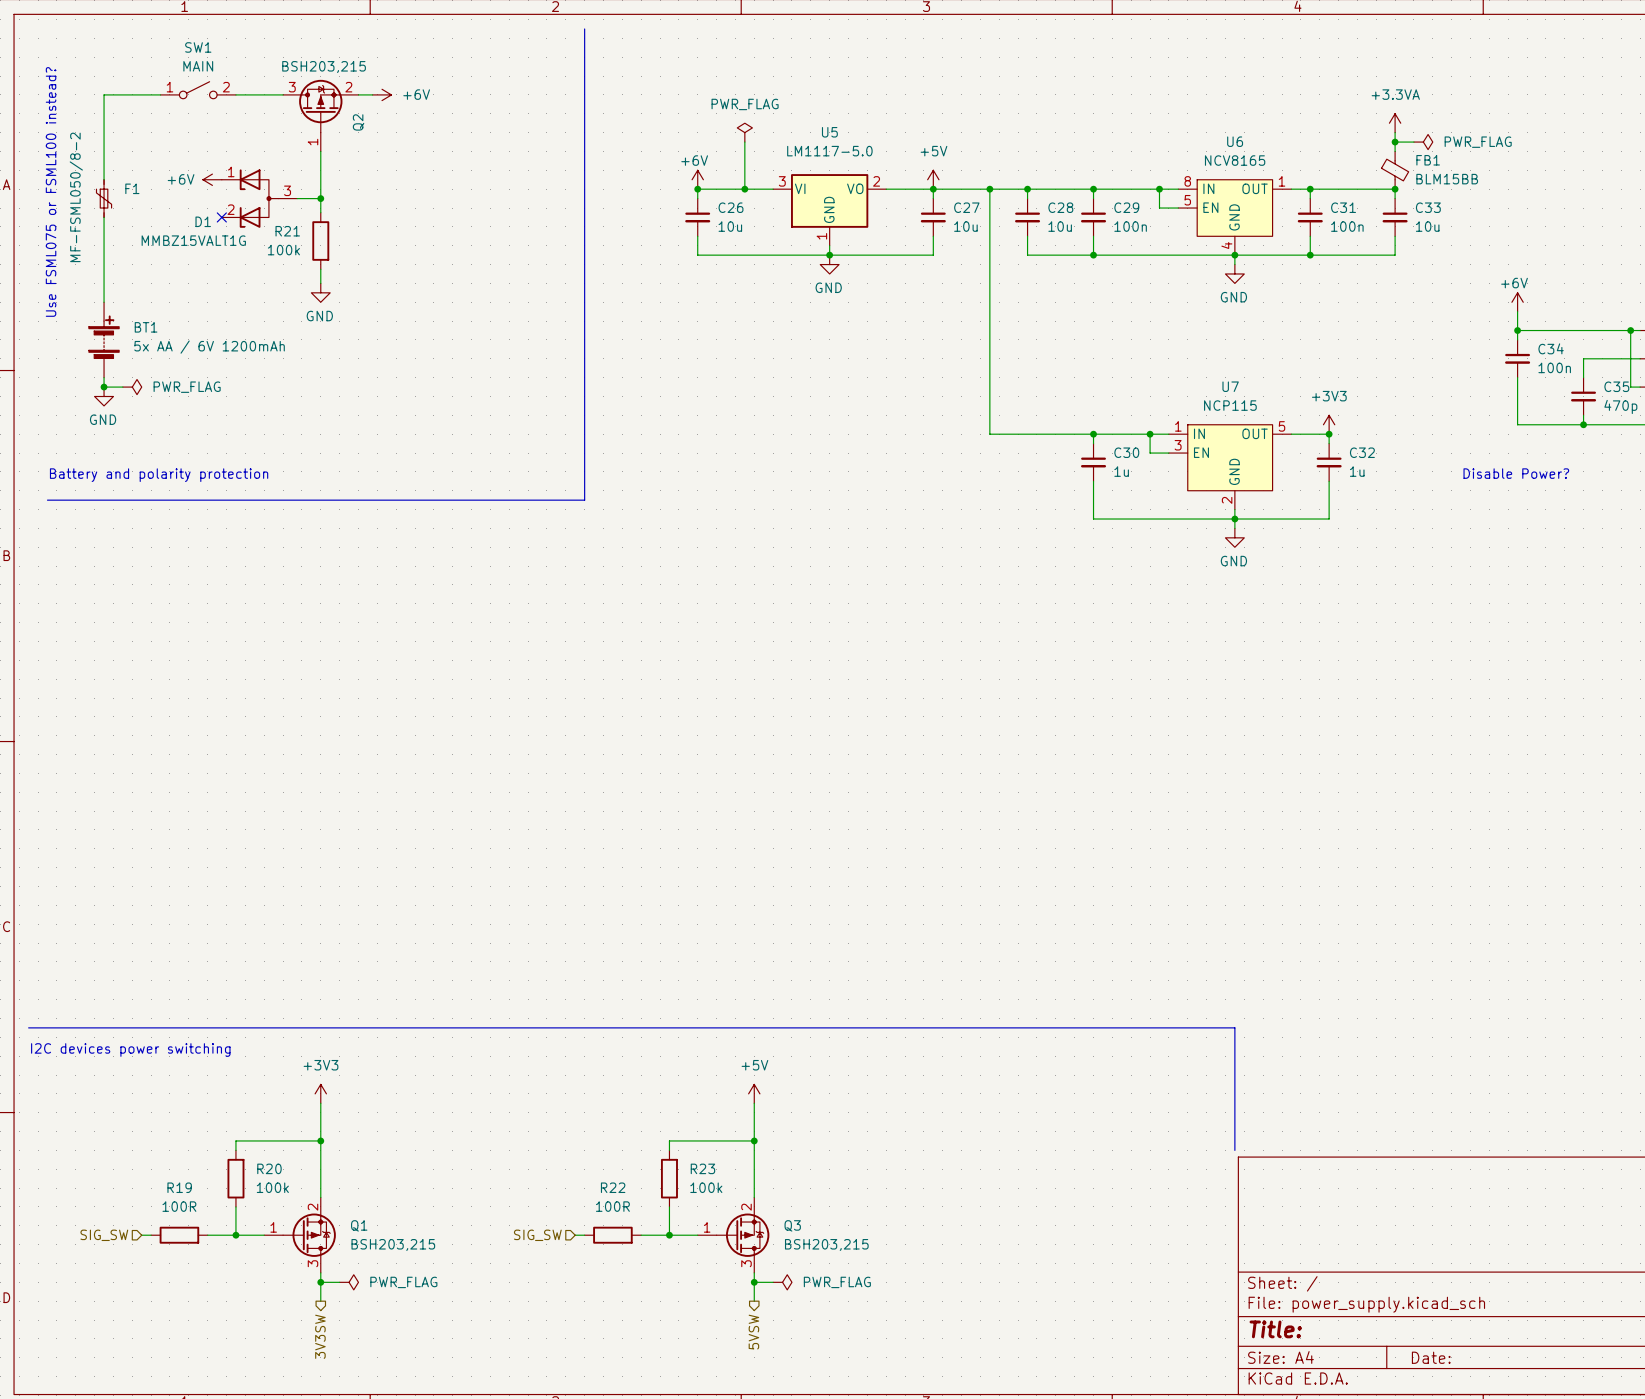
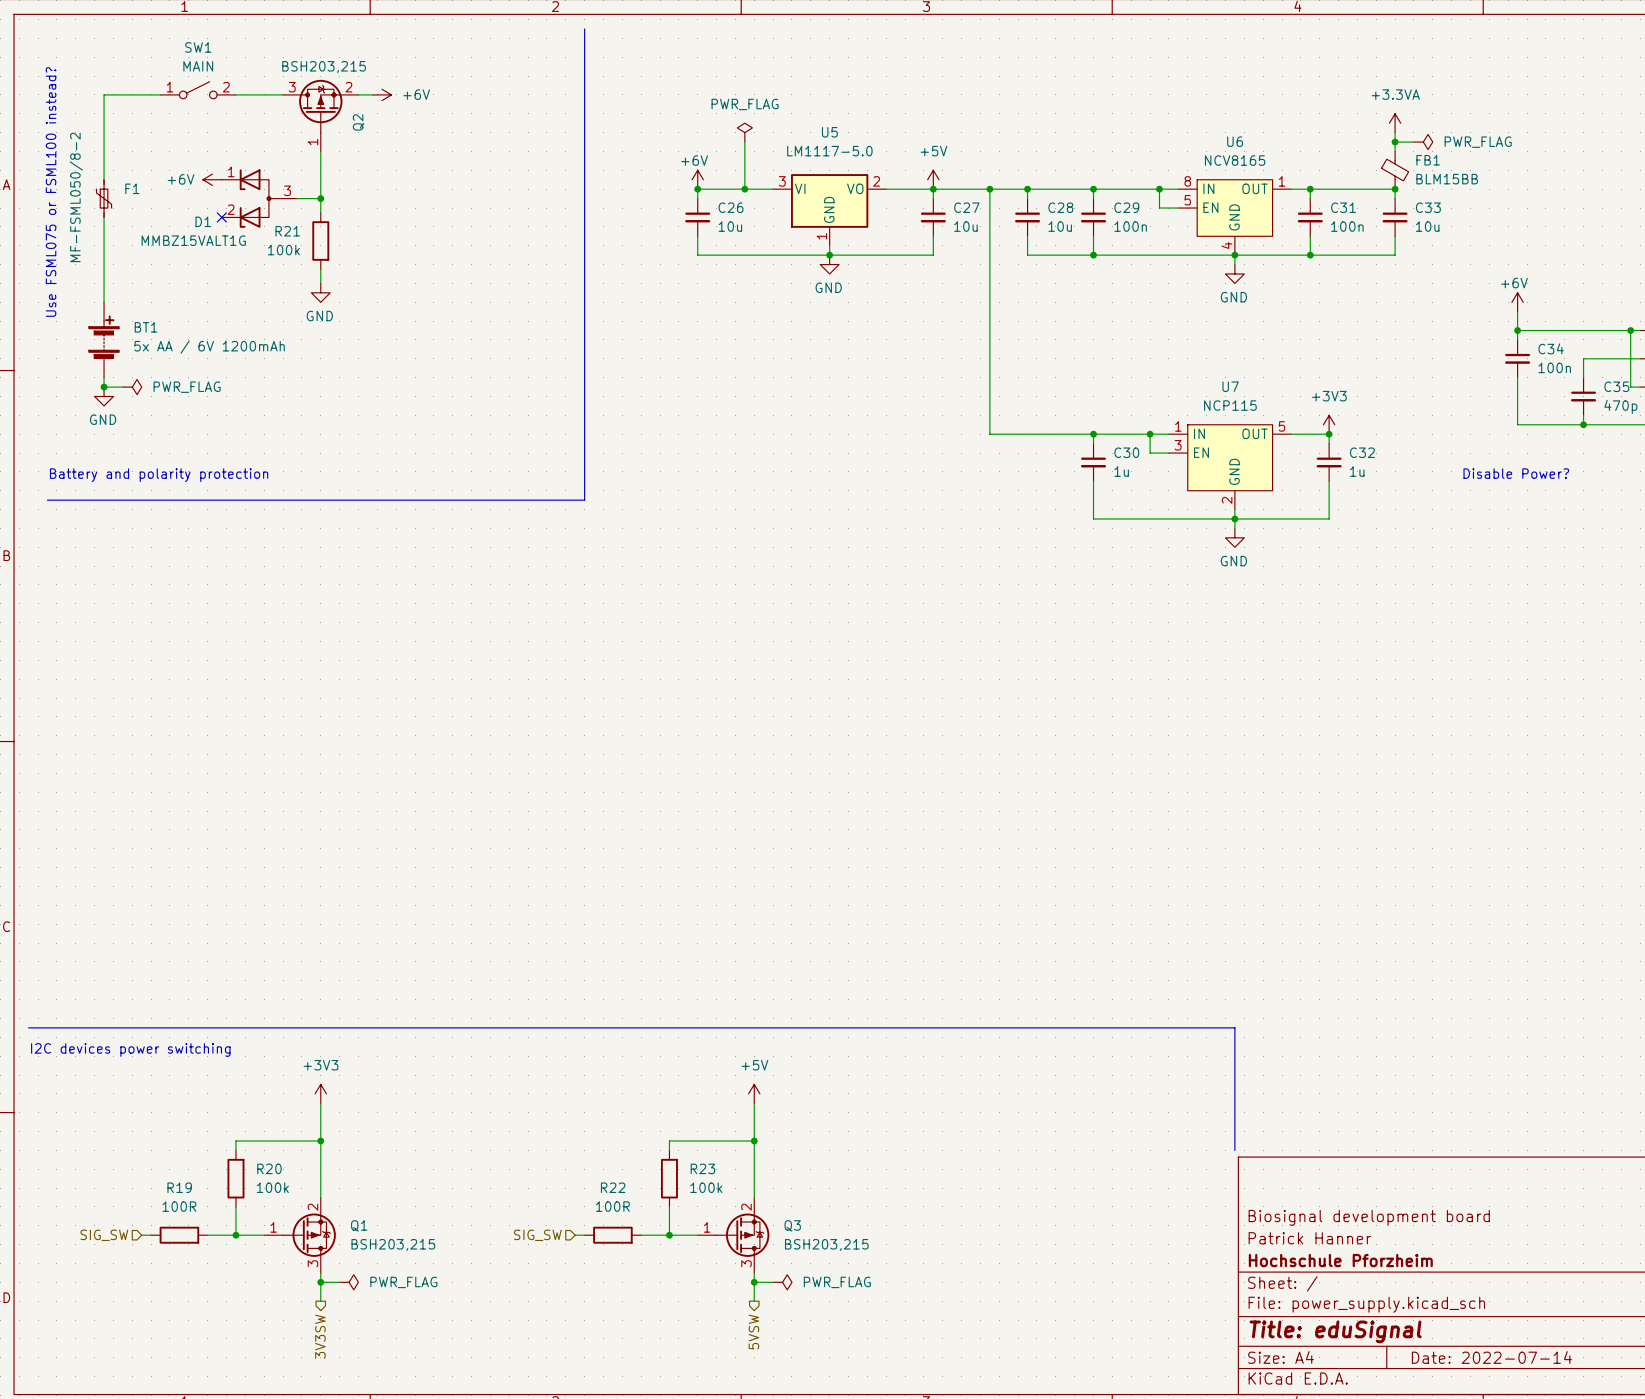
title block: none -> Biosignal development board (1369, 1217)
title block: none -> Patrick Hanner (1309, 1238)
title block: none -> Hochschule Pforzheim (1340, 1260)
title block: Title: (1275, 1329) -> Title: eduSignal (1335, 1331)
title block: Date: (1431, 1357) -> Date: 2022-07-14 (1491, 1357)

